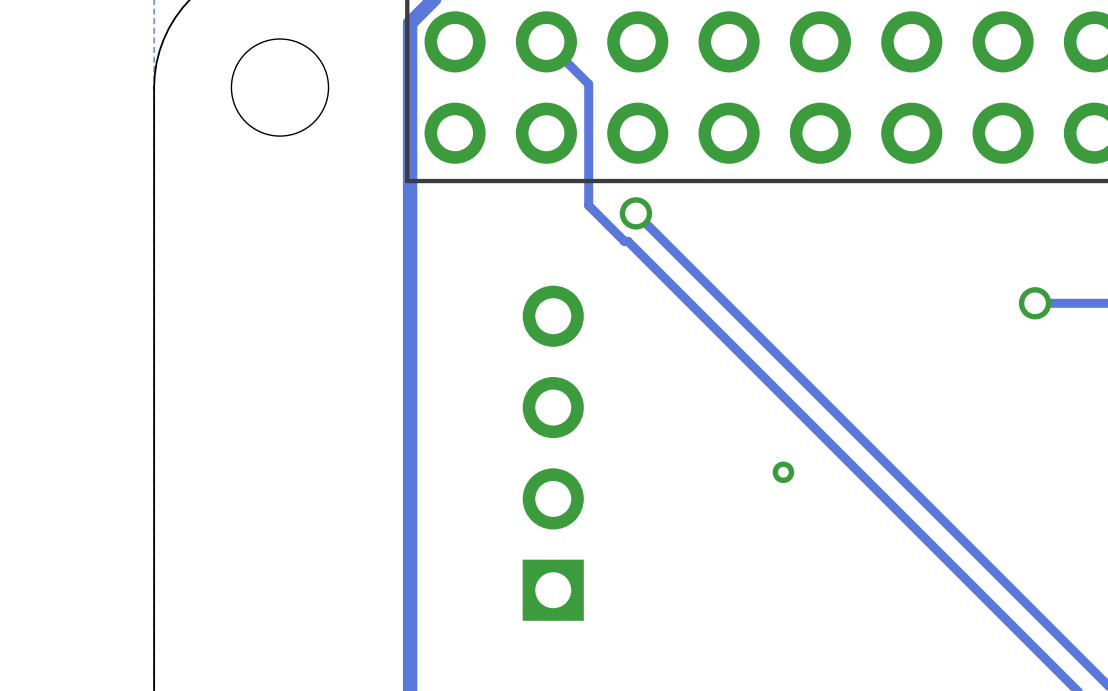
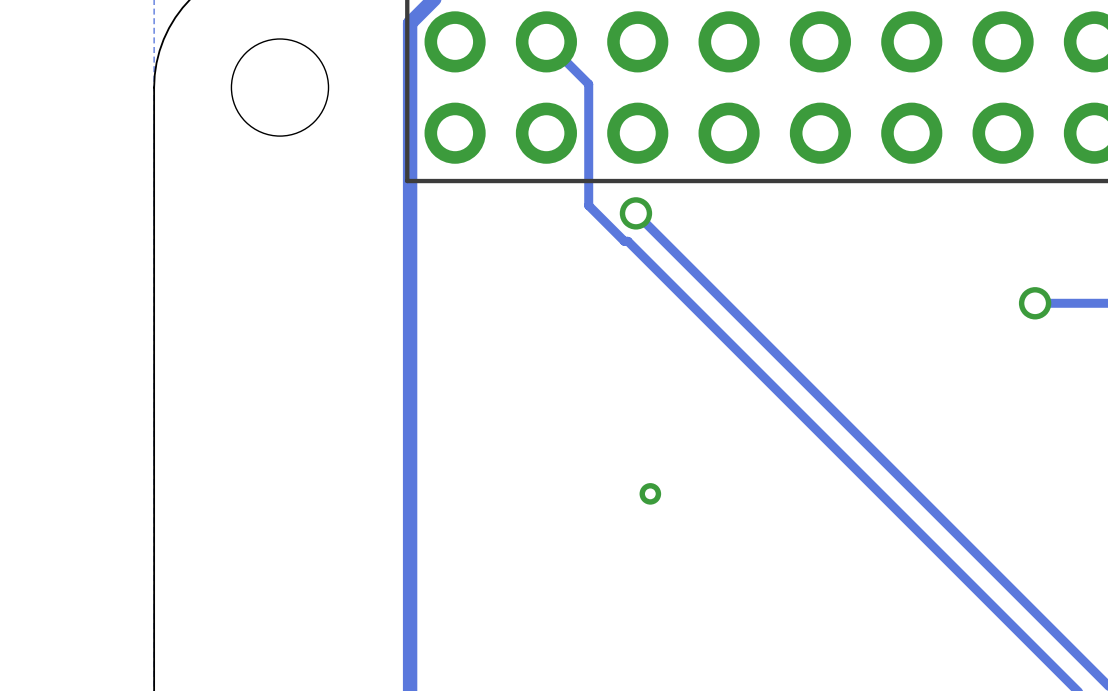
part: (553, 453) -> none
via position: (783, 472) -> (650, 493)

